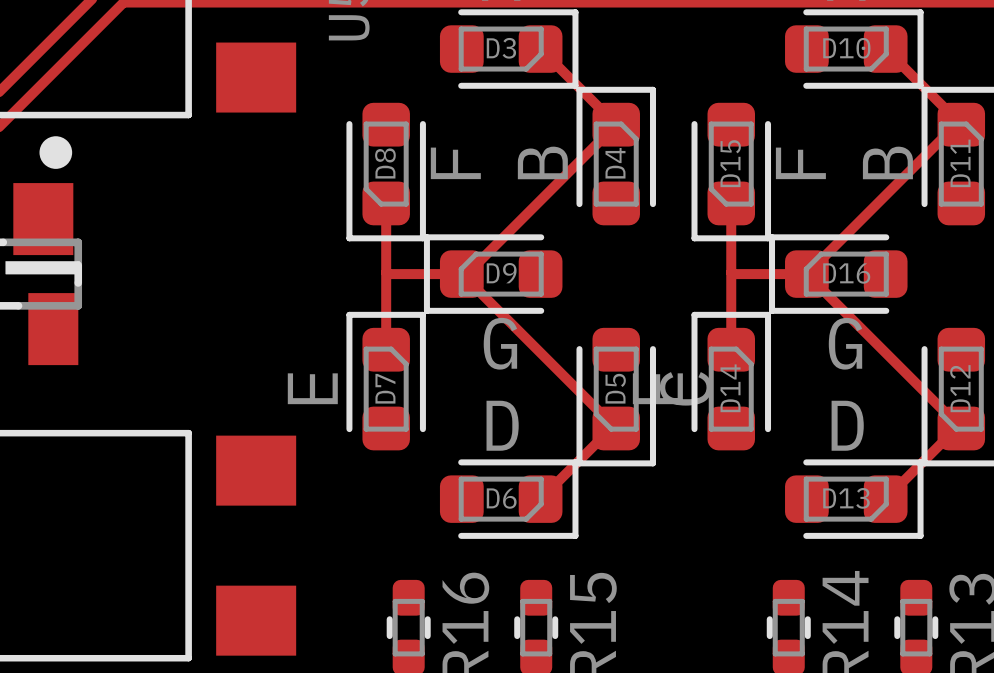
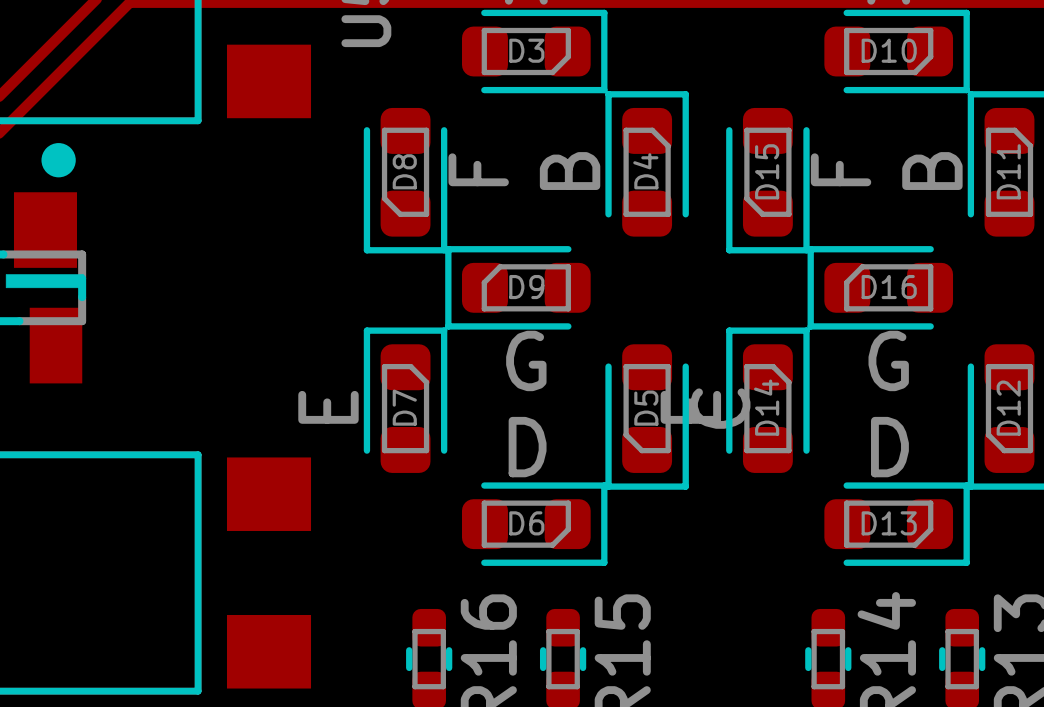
track: (540, 49) (616, 124) (466, 274) (386, 272) -> none
track: (885, 49) (961, 124) (956, 124) (806, 274) -> none
track: (386, 203) (386, 349) -> none
track: (731, 203) (731, 349) -> none
track: (731, 272) (806, 274) -> none
track: (461, 274) (616, 428) (611, 428) (540, 499) -> none
track: (806, 274) (961, 428) (956, 428) (885, 499) -> none

